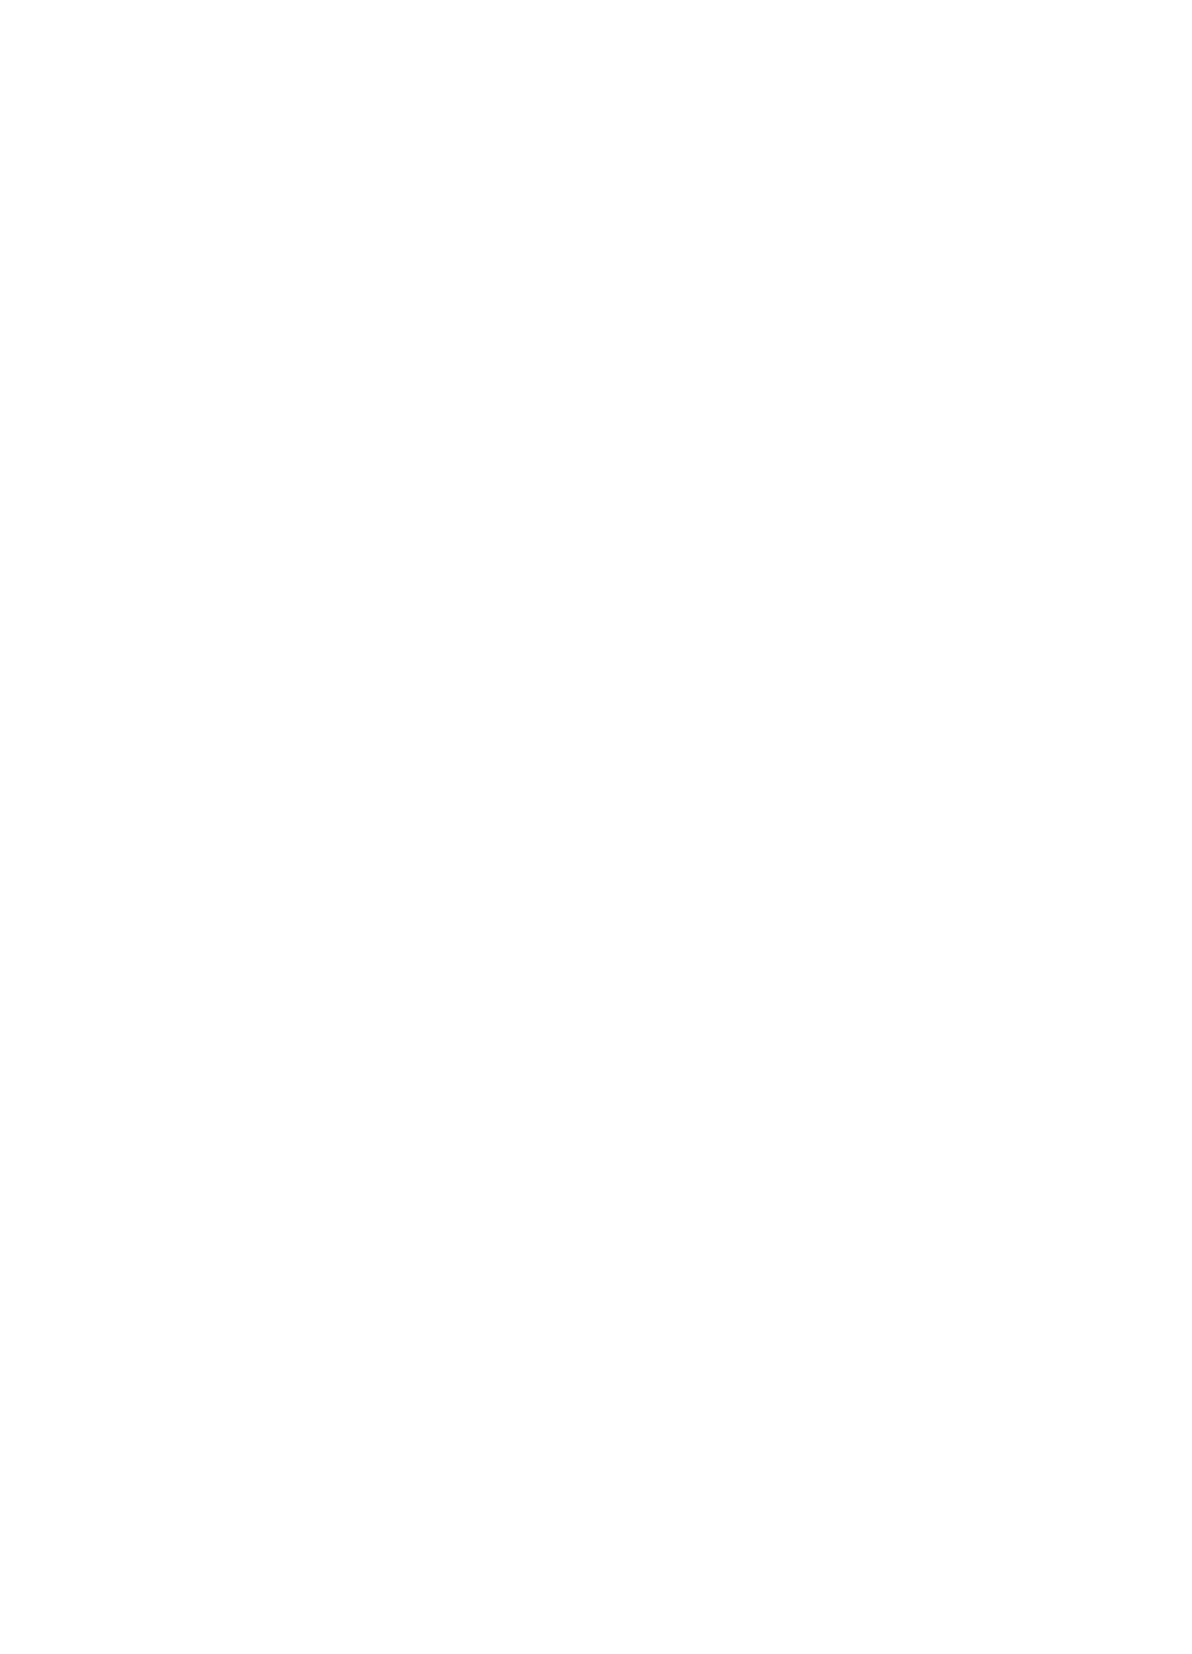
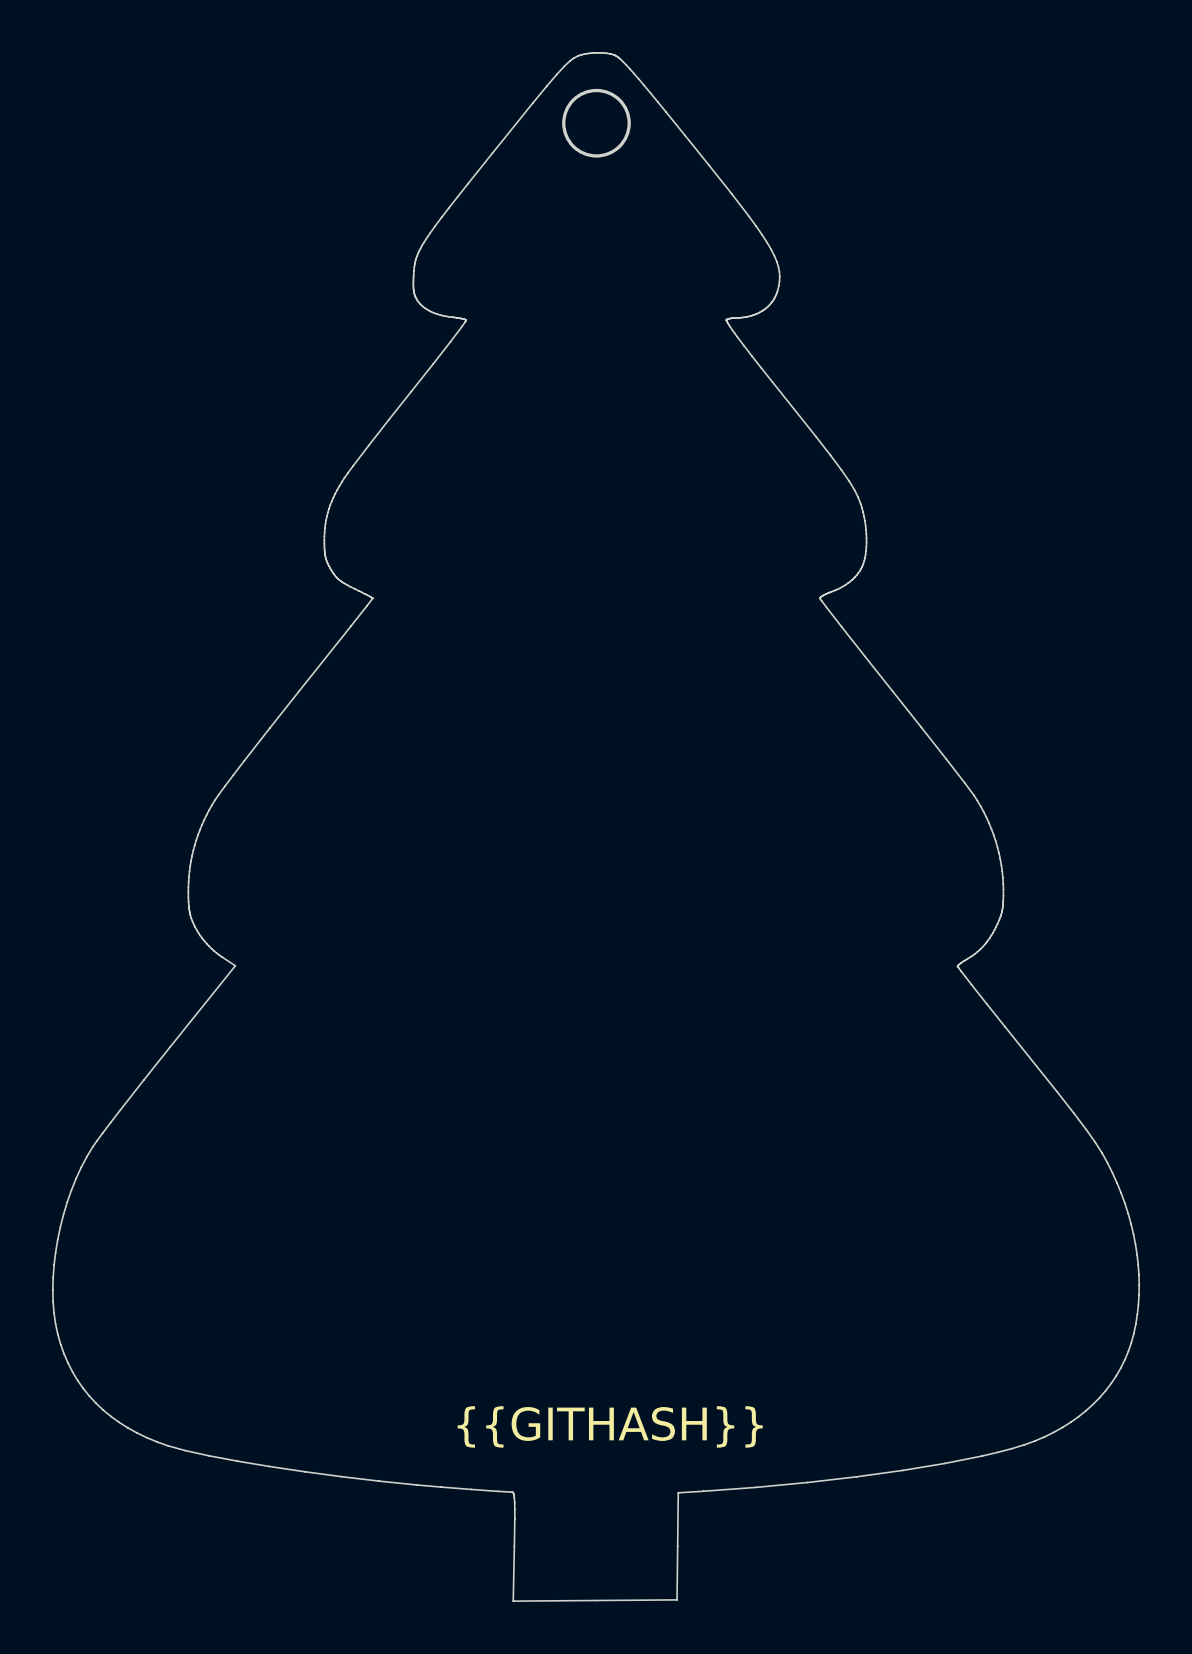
round board edge: none -> [562, 88, 631, 158]
board edge: none -> (465, 319) (433, 312) (422, 306) (417, 300) (413, 290) (413, 277) (415, 262) (419, 250) (449, 207) (556, 74) (574, 58) (584, 54) (597, 52) (615, 55) (633, 73) (731, 193) (762, 234) (774, 255) (778, 266) (779, 281) (772, 301) (755, 314) (726, 319)
board edge: none -> (466, 320) (347, 473) (337, 489) (329, 508) (324, 540) (325, 555) (328, 564) (340, 581) (372, 598)
board edge: none -> (726, 320) (743, 345) (841, 469) (854, 489) (860, 504) (866, 534) (863, 564) (849, 581) (820, 597)
board edge: none -> (372, 598) (233, 774) (206, 814) (198, 834) (191, 860) (188, 887) (189, 912) (195, 927) (204, 941) (216, 953) (235, 965) (93, 1146) (76, 1178) (63, 1214) (55, 1252) (52, 1289) (55, 1324) (60, 1344) (68, 1363) (83, 1388) (103, 1410) (127, 1427) (168, 1445) (236, 1461) (379, 1481) (512, 1492) (514, 1509) (513, 1601) (677, 1599) (678, 1492) (807, 1482) (902, 1470) (997, 1452) (1024, 1444) (1053, 1432) (1078, 1416) (1099, 1397) (1116, 1375) (1128, 1351) (1135, 1324) (1139, 1295) (1138, 1264) (1133, 1234) (1117, 1183) (1095, 1142) (957, 966)
board edge: none -> (820, 598) (964, 782) (980, 806) (991, 829) (1002, 871) (1003, 895) (1001, 913) (994, 929) (984, 944) (957, 965)
text: none -> {{GITHASH}} (610, 1426)

